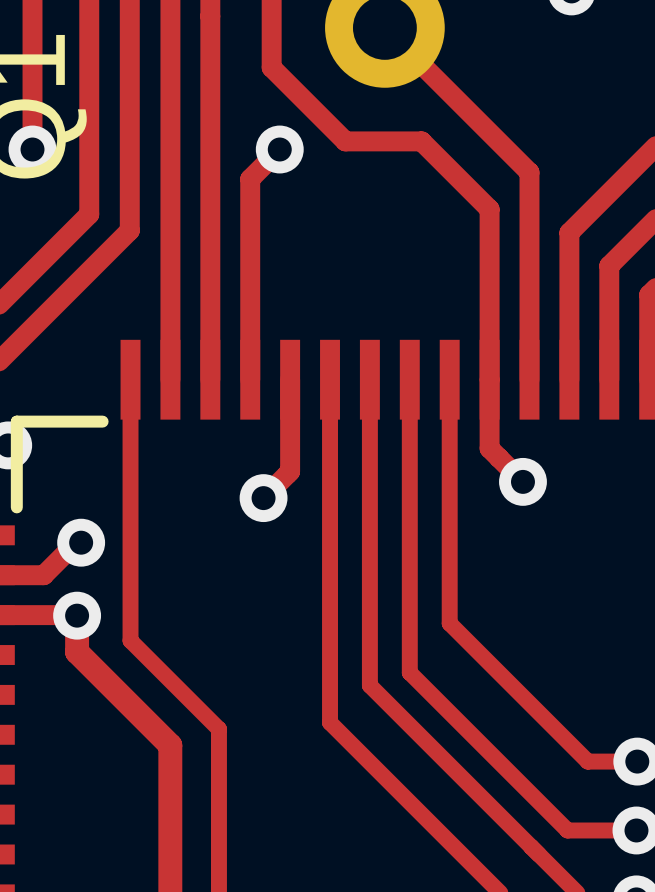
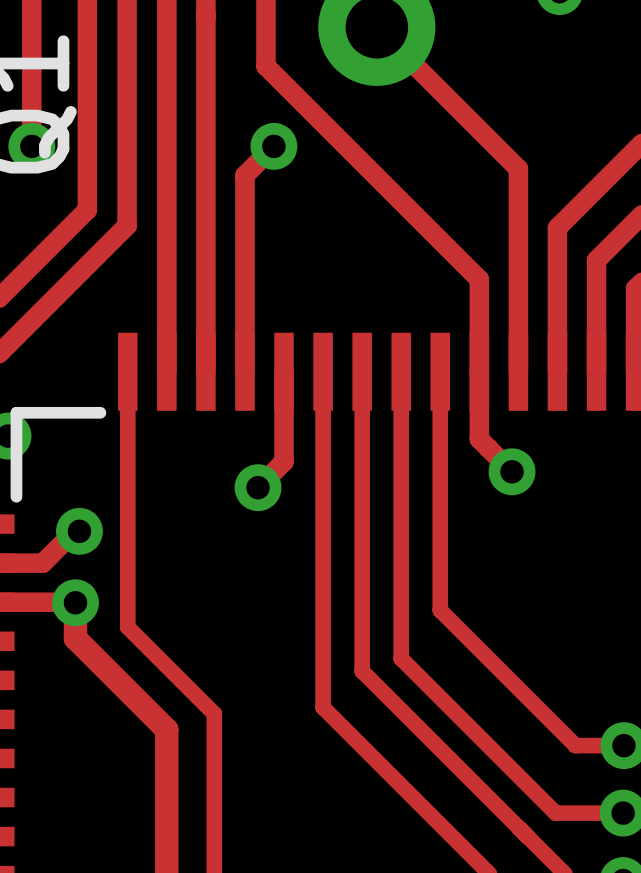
track: (345, 141) (421, 141) (489, 209) (489, 285) -> (338, 138) (479, 279)

